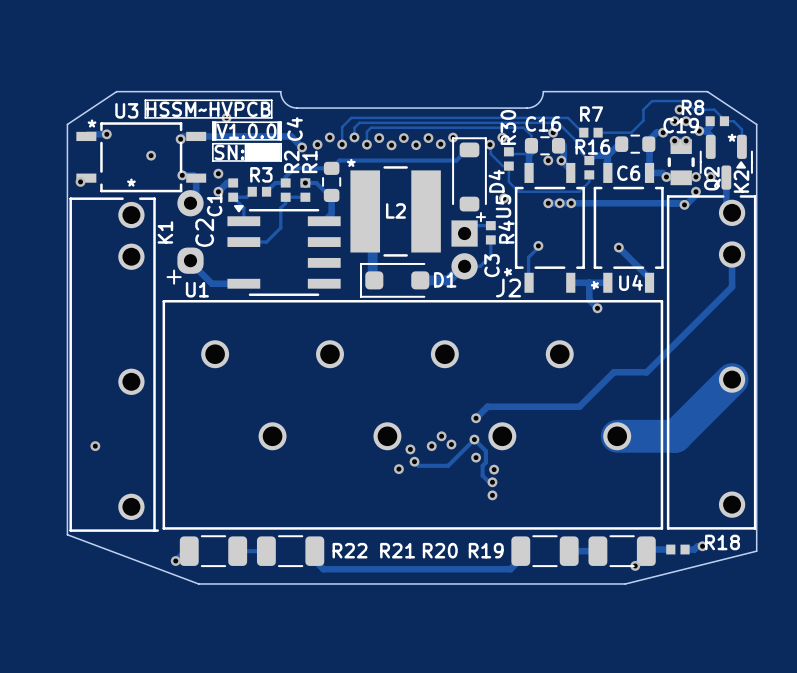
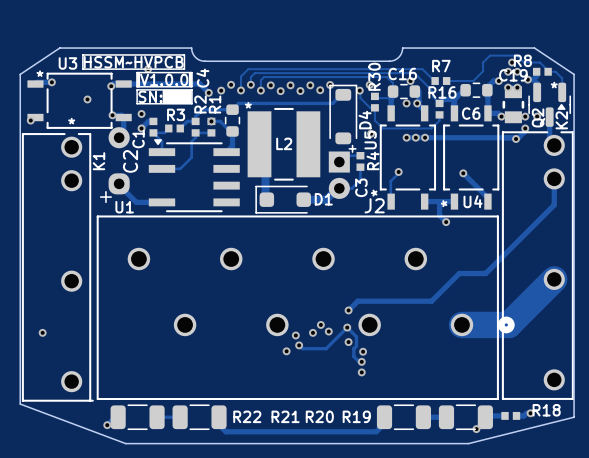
J2 footprint: [162, 300, 664, 530] -> [96, 215, 515, 401]

